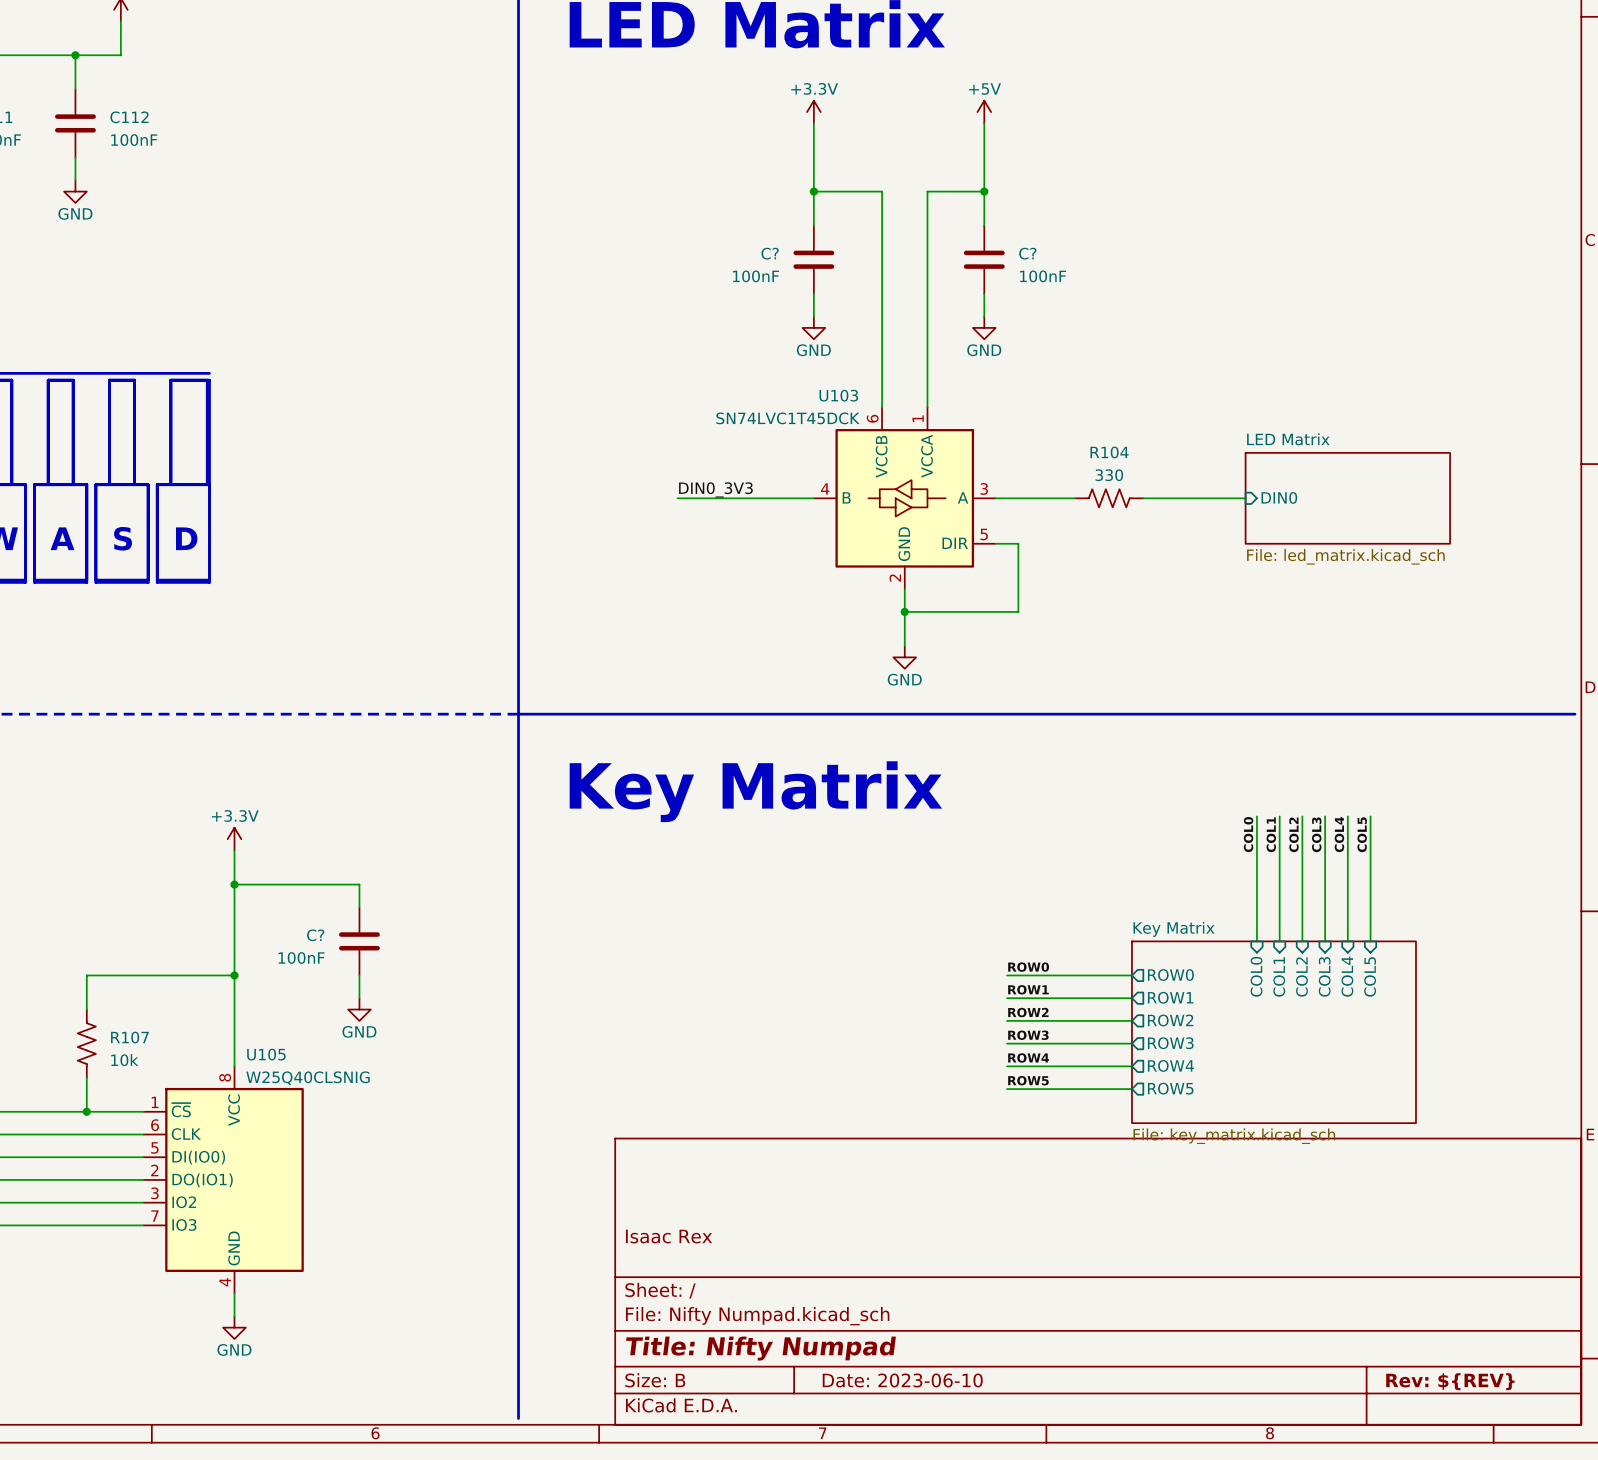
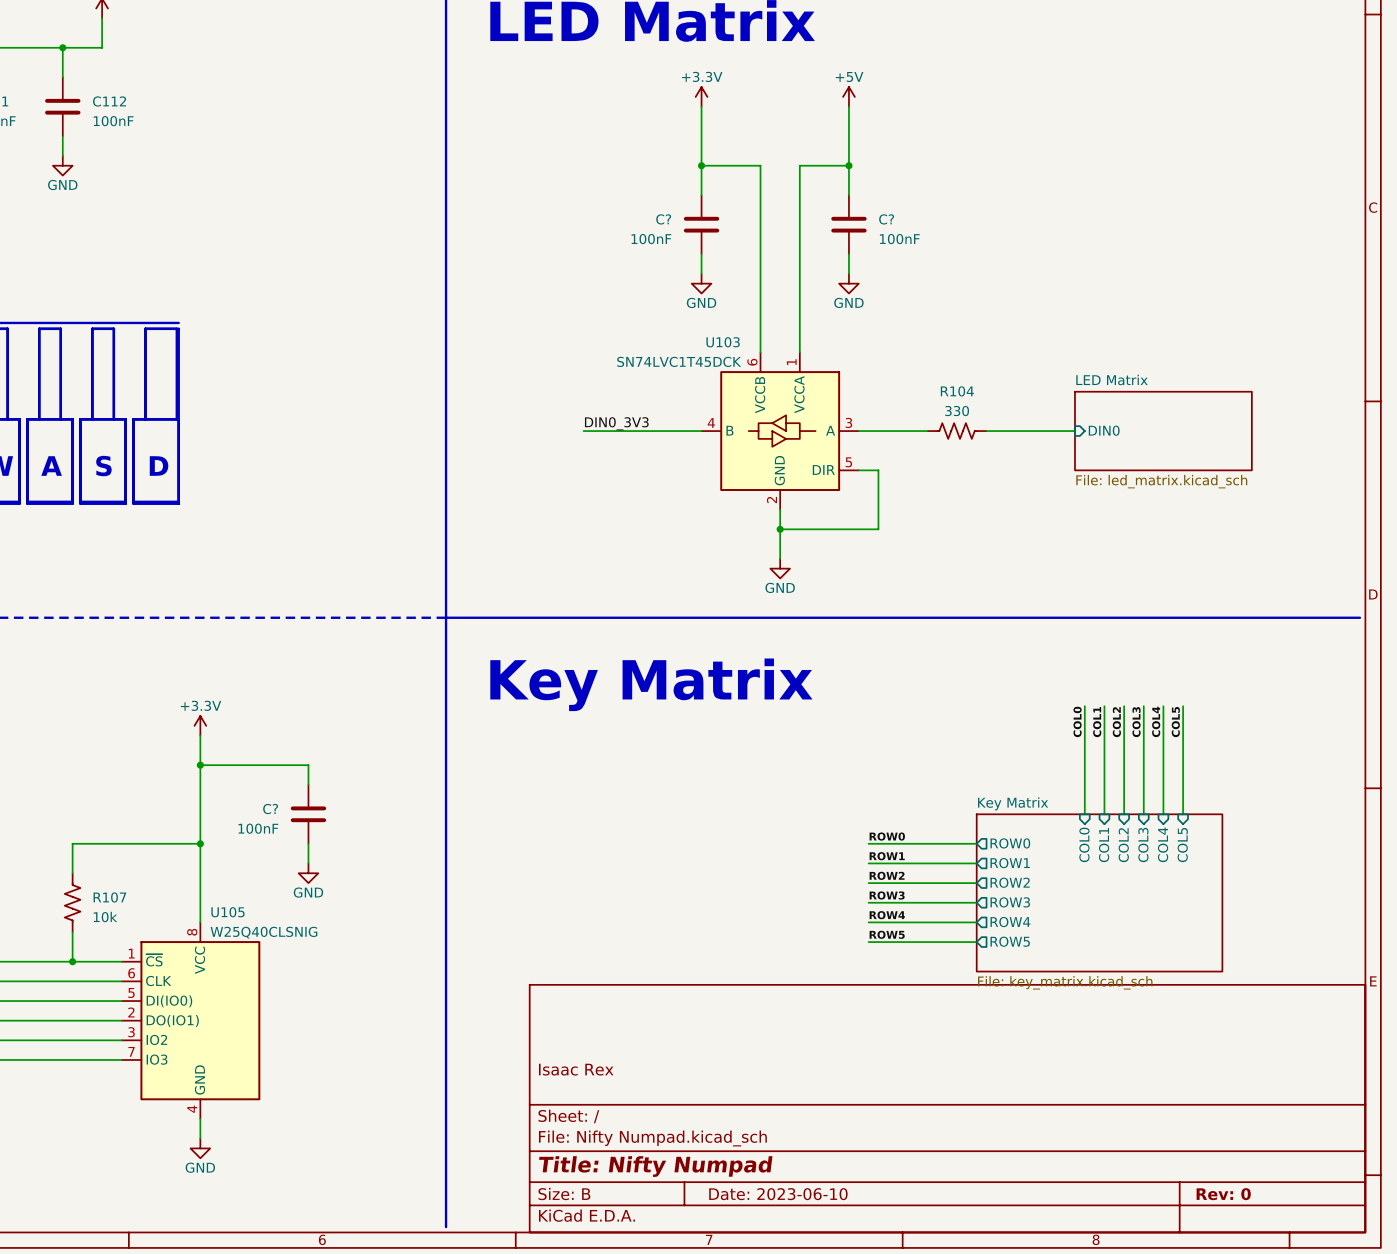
title block: Rev: ${REV} (1450, 1381) -> Rev: 0 (1223, 1194)

